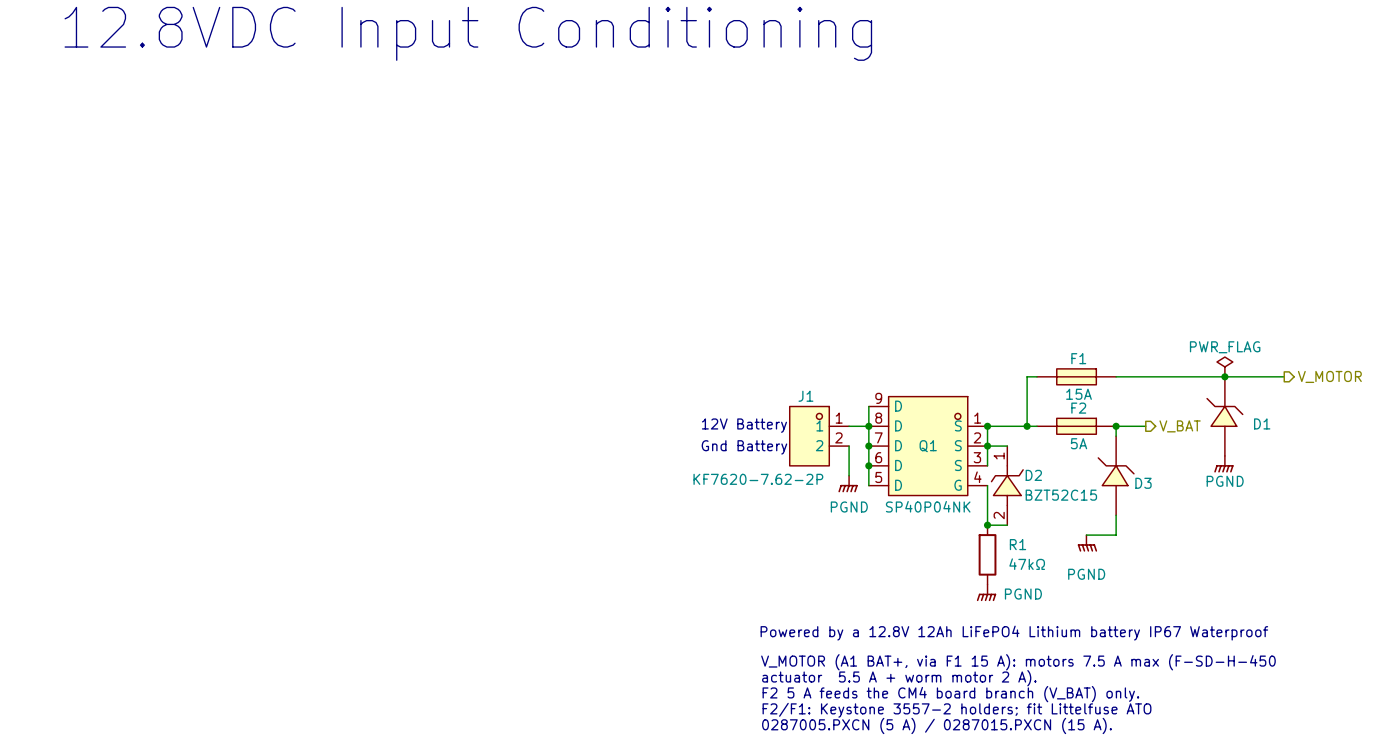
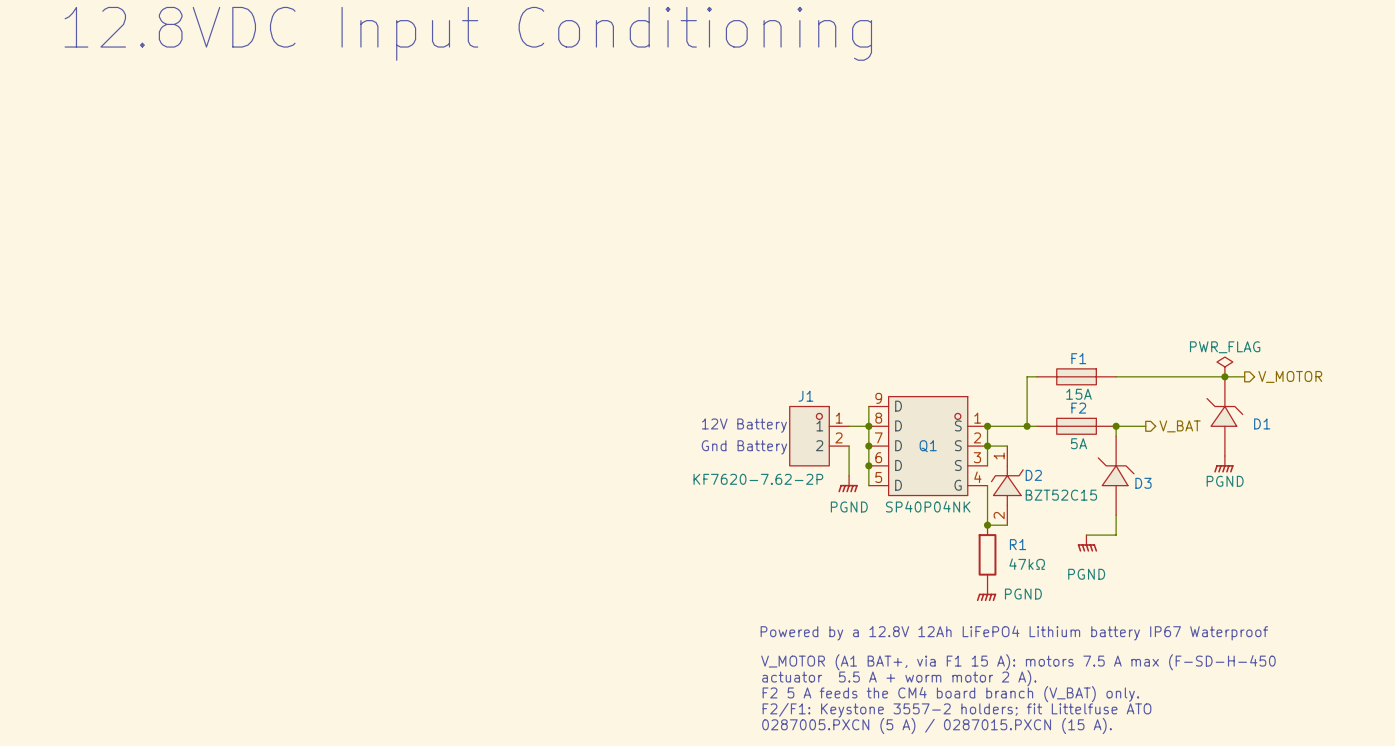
wire: (1244, 376) (1284, 376) -> none
hierarchical label position: V_MOTOR (1329, 376) -> V_MOTOR (1290, 376)

